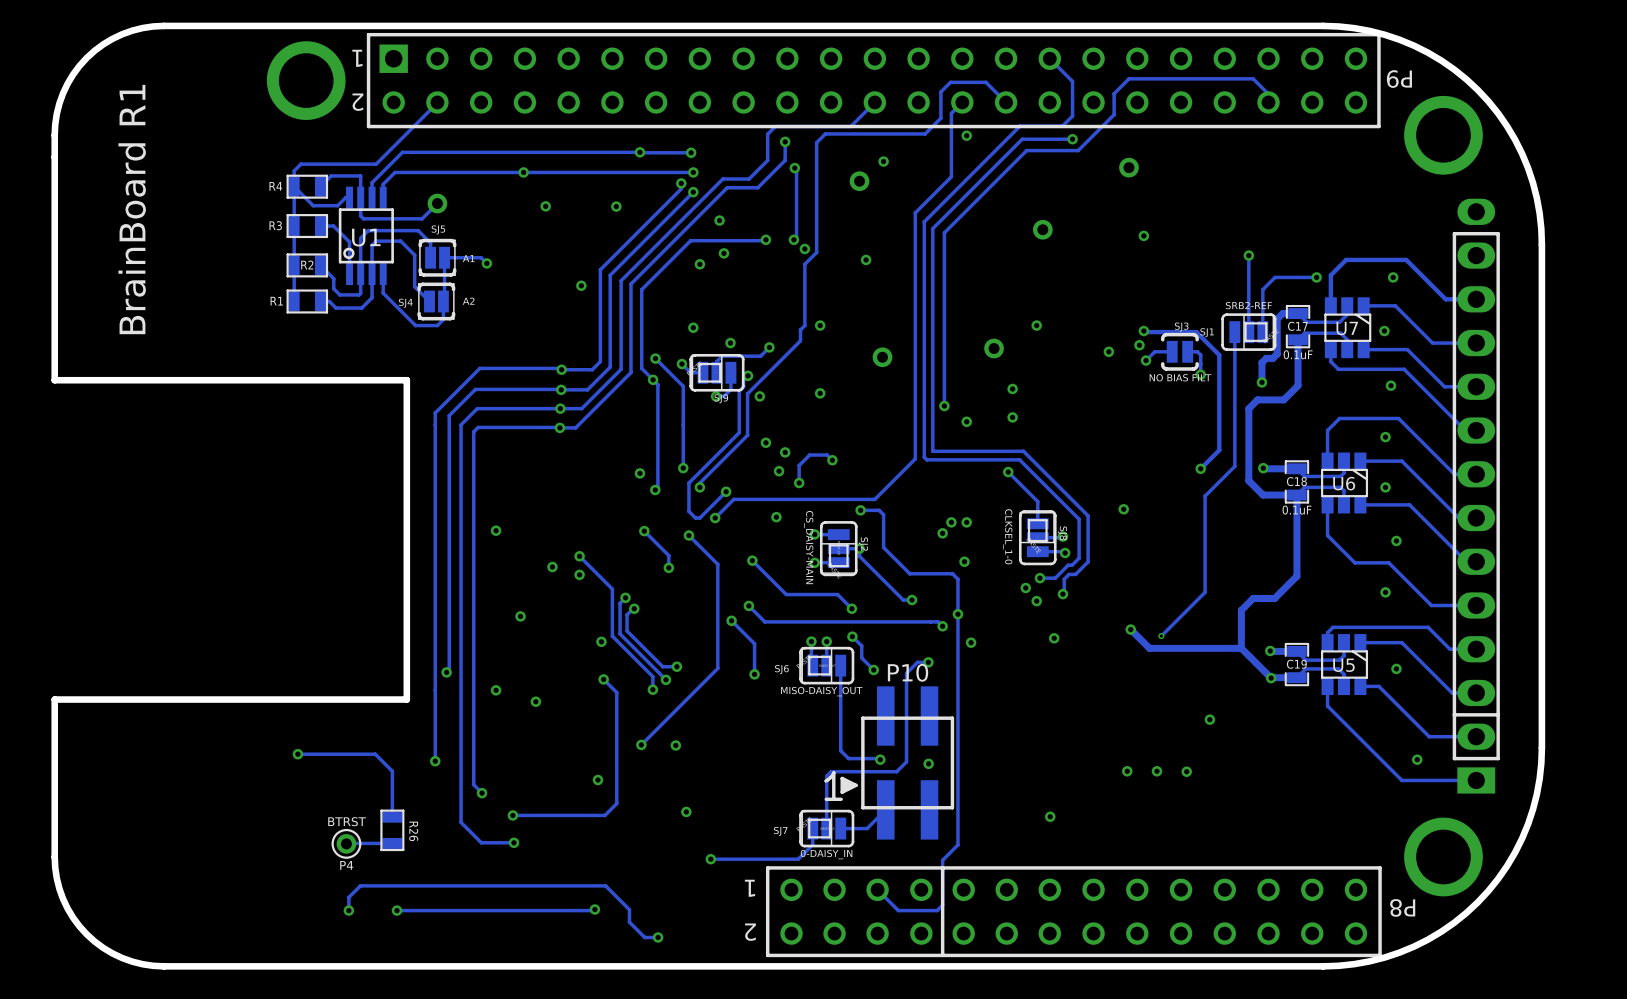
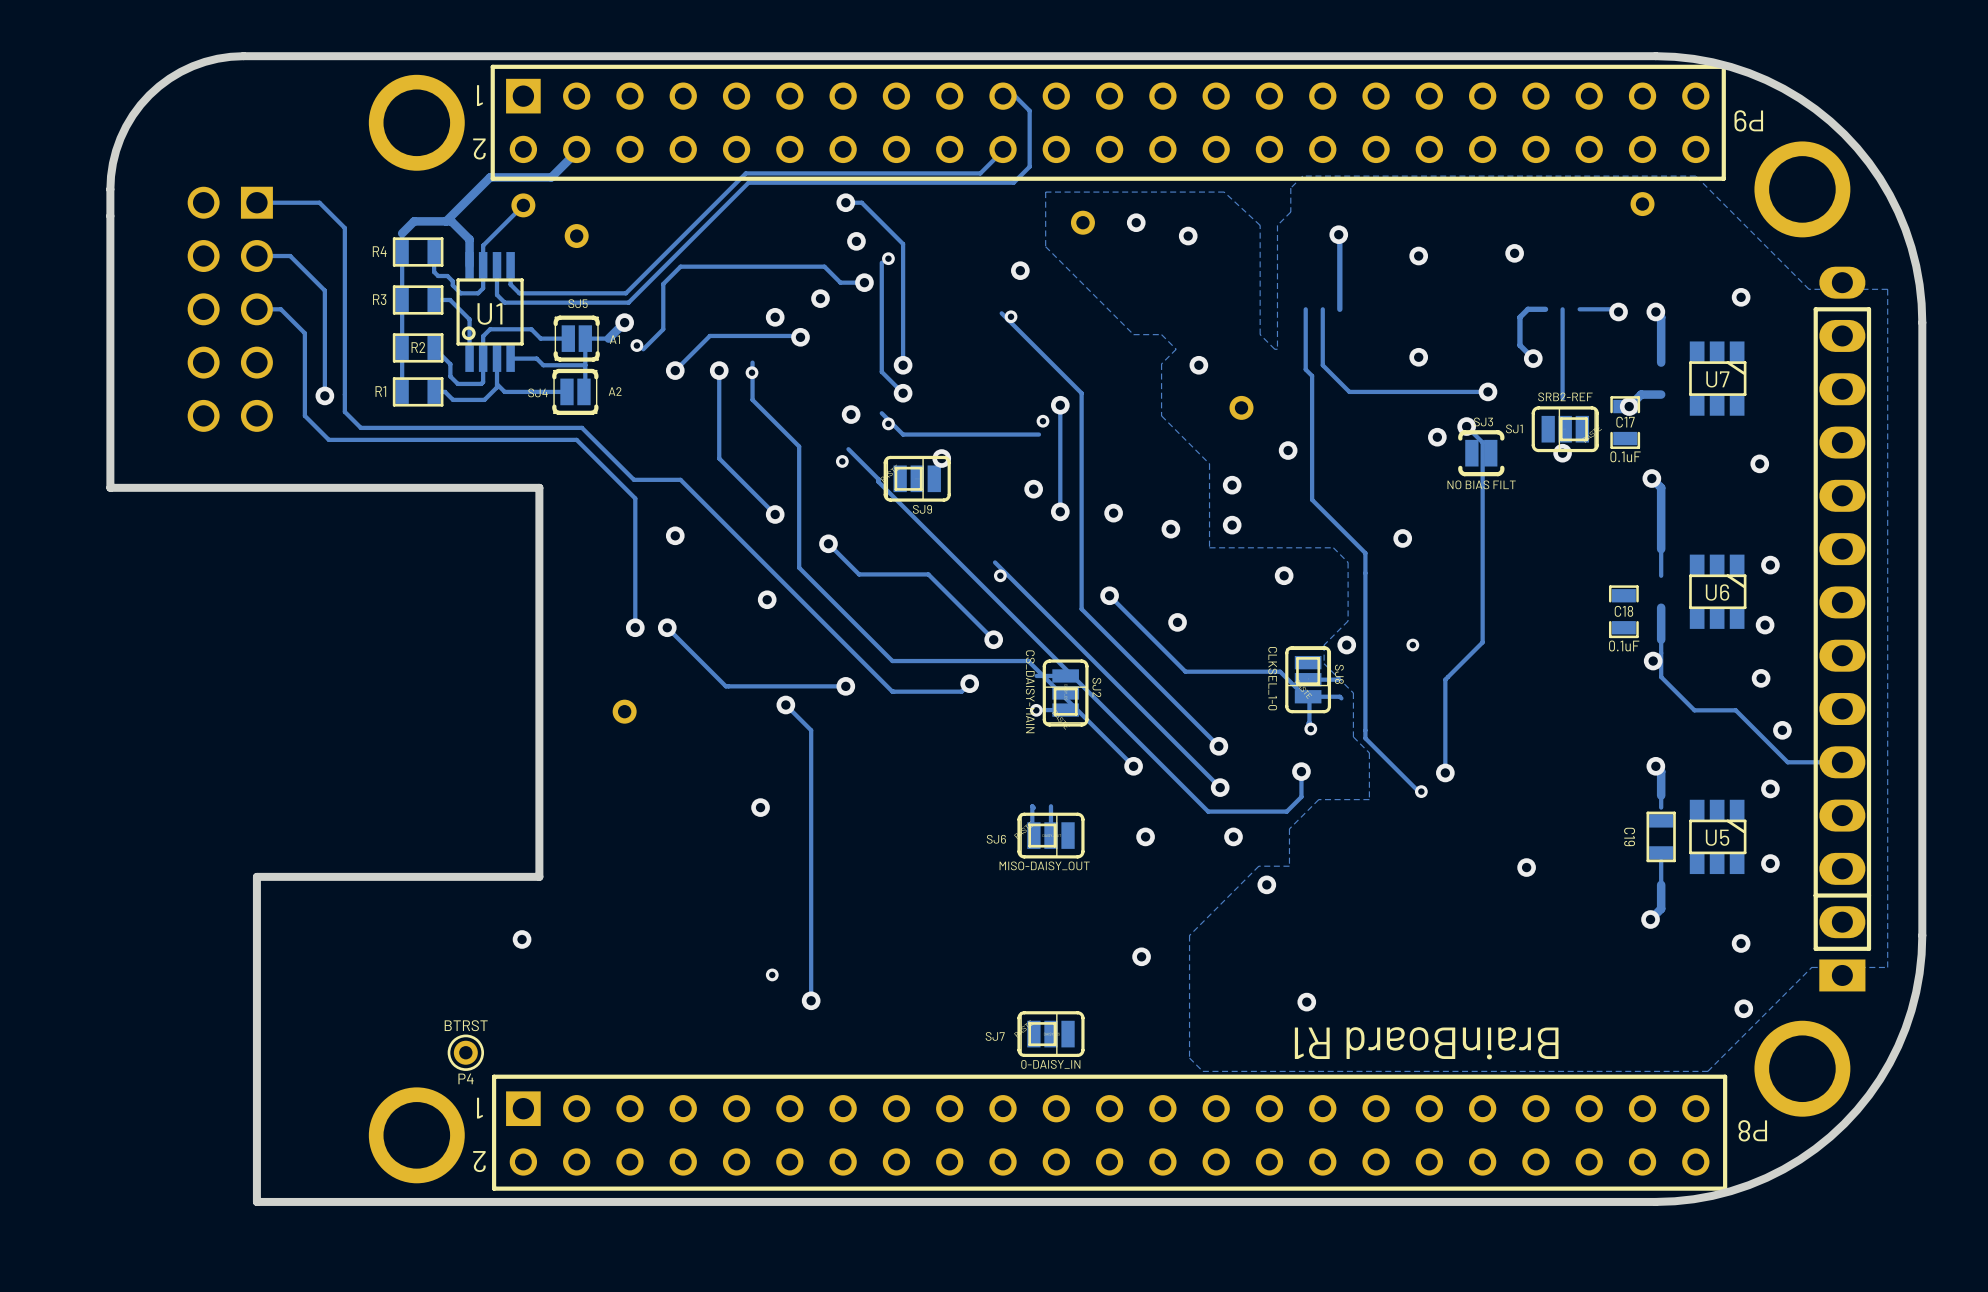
part footprint: [51, 22, 1546, 970] -> [106, 52, 1927, 1206]
track: (1049, 58) (1072, 81) (1072, 116) (1062, 126) (1020, 126) (924, 221) (924, 457) (926, 459) (1019, 459) (1079, 519) (1079, 558) (1072, 565) (1068, 565) (1055, 578) (1039, 578) -> none
track: (437, 102) (376, 164) (300, 164) (294, 171) -> (576, 149) (576, 152) (551, 177) (490, 177) (446, 221)
track: (874, 102) (850, 126) (775, 126) (767, 134) (767, 160) (749, 179) (722, 179) (621, 280) (621, 369) (581, 408) (477, 408) (461, 424) (461, 822) (481, 842) (513, 842) -> none
track: (962, 102) (951, 113) (951, 176) (915, 212) (915, 458) (874, 499) (733, 499) (715, 518) -> none
track: (1006, 102) (985, 82) (950, 82) (940, 91) (940, 118) (925, 133) (825, 133) (816, 142) (816, 252) (804, 264) (804, 325) (800, 329) (800, 340) (747, 393) (747, 435) (699, 483) (699, 487) -> none
track: (1268, 102) (1268, 94) (1253, 78) (1128, 78) (1114, 93) (1114, 114) (1078, 150) (1026, 150) (944, 232) (944, 406) -> none
zone outline: none -> (1695, 176) (1809, 289) (1887, 289) (1887, 967) (1811, 967) (1707, 1071) (1202, 1071) (1189, 1058) (1189, 935) (1258, 866) (1289, 866) (1289, 828) (1318, 799) (1369, 799) (1369, 752) (1353, 736) (1353, 693) (1324, 663) (1324, 645) (1348, 621) (1348, 562) (1333, 547) (1209, 547) (1209, 463) (1161, 415) (1161, 363) (1176, 349) (1161, 334) (1133, 334) (1045, 246) (1045, 192) (1224, 192) (1260, 225) (1260, 334) (1274, 349) (1277, 349) (1277, 225) (1290, 212) (1290, 188) (1302, 176) (1695, 176)
via: (966, 135) -> none
track: (1072, 139) (1022, 139) (932, 228) (932, 451) (1023, 451) (1088, 515) (1088, 561) (1075, 574) (1069, 574) (1064, 579) (1062, 594) -> none
via: (1072, 139) -> none
track: (785, 141) (785, 160) (757, 187) (727, 187) (630, 284) (630, 372) (575, 427) (478, 427) (473, 431) (473, 784) (482, 793) -> none
via: (785, 141) -> none
track: none -> (256, 202) (319, 202) (344, 228) (344, 411) (360, 427) (582, 427) (633, 479) (680, 479) (892, 691) (961, 691) (969, 683)
track: none -> (845, 202) (861, 202) (903, 244) (903, 365)
via: none -> (845, 202)
part: none -> (1642, 204)
part: none -> (523, 205)
via: (639, 152) -> none
track: (691, 152) (402, 152) (372, 182) (372, 197) -> (997, 96) (1015, 96) (1029, 110) (1029, 166) (1013, 182) (748, 182) (628, 302) (504, 302) (497, 294) (497, 265)
via: (691, 152) -> none
via: (883, 161) -> none
via: none -> (1136, 222)
part: (1128, 167) -> none
track: (794, 168) (796, 169) (796, 237) (793, 239) -> none
via: (794, 168) -> none
via: (523, 172) -> none
track: (693, 172) (395, 172) (383, 184) (383, 197) -> (1003, 149) (980, 173) (745, 173) (625, 293) (519, 293) (510, 284) (510, 265)
via: (693, 172) -> none
track: none -> (1338, 234) (1339, 309)
via: none -> (1338, 234)
via: none -> (1188, 236)
track: (360, 175) (331, 175) (320, 186) -> (483, 287) (478, 293) (460, 293) (447, 276) (438, 276) (434, 272) (434, 252)
track: (360, 176) (360, 181) -> (523, 205) (483, 245)
via: none -> (856, 241)
part position: (859, 181) -> (1082, 222)
track: (681, 183) (681, 188) (600, 269) (600, 361) (592, 369) (479, 368) (435, 413) (435, 761) -> none
via: (681, 183) -> none
track: (294, 186) (313, 205) (337, 205) (345, 197) (349, 197) -> (402, 233) (414, 221) (451, 221) (469, 239) (469, 265)
via: none -> (1514, 253)
track: none -> (256, 256) (290, 256) (324, 290) (324, 395)
via: none -> (1418, 256)
track: (693, 192) (610, 275) (610, 367) (587, 389) (475, 389) (449, 415) (449, 669) (446, 672) -> none
track: none -> (881, 262) (881, 371) (903, 393)
via: none -> (1020, 270)
track: (437, 203) (422, 218) (363, 218) (360, 215) -> none
part position: (437, 203) -> (576, 236)
via: (545, 206) -> none
via: (616, 206) -> none
text: BrainBoard R1 (132, 209) -> none
track: none -> (864, 282) (840, 282) (824, 266) (680, 266) (663, 283) (663, 329) (643, 349)
via: none -> (864, 282)
via: (719, 220) -> none
via: none -> (1741, 297)
via: none -> (820, 298)
part: (1042, 229) -> none
part: none -> (230, 309)
track: none -> (256, 309) (280, 309) (304, 333) (304, 415) (328, 439) (576, 439) (635, 498) (635, 627)
track: none -> (1305, 309) (1305, 369) (1312, 375) (1312, 499) (1365, 553) (1365, 738) (1417, 791)
track: none -> (1322, 309) (1322, 365) (1349, 391) (1487, 391)
track: none -> (1545, 309) (1527, 309) (1519, 317) (1519, 345) (1533, 358)
track: none -> (1562, 309) (1562, 398)
track: none -> (1579, 309) (1615, 309) (1618, 311)
via: (1143, 235) -> none
via: none -> (1618, 311)
track: none -> (1655, 311) (1661, 317) (1661, 362)
via: none -> (1655, 311)
track: none -> (1001, 313) (1081, 393) (1081, 609) (1218, 746)
track: (765, 239) (690, 240) (641, 289) (641, 368) (657, 384) (657, 487) (655, 490) -> none
via: (765, 239) -> none
via: none -> (775, 317)
via: none -> (624, 322)
via: (804, 249) -> none
via: (723, 253) -> none
track: (360, 255) (360, 238) (368, 230) (418, 230) (430, 243) (430, 257) -> (483, 336) (490, 329) (531, 329) (540, 338) (568, 338)
track: (1248, 255) (1248, 332) -> none
via: (1248, 255) -> none
track: none -> (800, 337) (709, 335) (675, 370)
via: none -> (800, 337)
track: (463, 257) (481, 257) (486, 263) -> (608, 338) (624, 322)
via: (866, 259) -> none
via: (699, 264) -> none
via: none -> (1418, 357)
track: (372, 274) (372, 245) (376, 241) (400, 241) (414, 255) (414, 286) (429, 301) -> (497, 384) (504, 391) (566, 391)
track: (383, 274) (383, 293) (415, 325) (437, 325) (443, 319) (443, 301) -> (510, 358) (536, 358) (543, 365) (585, 365)
via: none -> (1533, 358)
track: none -> (752, 362) (752, 399) (799, 446) (799, 567) (892, 661) (1028, 661) (1133, 766)
track: (1316, 277) (1275, 277) (1262, 289) (1262, 332) -> none
via: (1316, 277) -> none
via: (1393, 277) -> none
via: none -> (903, 365)
via: none -> (1198, 365)
via: none -> (675, 370)
track: none -> (719, 370) (719, 458) (775, 514)
via: none -> (719, 370)
track: (1476, 299) (1445, 299) (1406, 259) (1346, 259) (1330, 275) (1330, 305) -> none
via: none -> (1487, 391)
via: none -> (903, 393)
track: none -> (1661, 394) (1641, 394) (1629, 406)
via: none -> (324, 395)
track: (1347, 305) (1347, 314) (1339, 322) (1306, 322) (1298, 313) (1282, 313) (1277, 318) (1277, 353) (1272, 358) (1266, 358) (1261, 362) (1261, 382) -> none
track: (1363, 305) (1395, 305) (1432, 343) (1476, 343) -> none
track: none -> (1060, 405) (1060, 511)
via: none -> (1060, 405)
via: none -> (1629, 406)
track: none -> (881, 413) (903, 434) (1038, 434)
via: none -> (851, 414)
via: (1036, 325) -> none
U7 position: (1347, 327) -> (1717, 378)
track: none -> (1466, 426) (1482, 442) (1482, 642) (1445, 679) (1445, 772)
via: none -> (1466, 426)
track: (1143, 331) (1196, 332) (1219, 355) (1219, 450) (1200, 468) -> none
via: (1143, 331) -> none
via: (1384, 331) -> none
track: (1234, 332) (1234, 466) (1205, 496) (1205, 592) (1161, 636) -> none
via: none -> (1437, 437)
via: (730, 343) -> none
via: (1139, 345) -> none
track: (769, 347) (760, 356) (722, 356) (716, 361) (716, 372) -> none
via: (769, 347) -> none
track: none -> (848, 449) (878, 479) (878, 481) (1208, 811) (1286, 811) (1301, 796) (1301, 771)
part position: (994, 348) -> (1241, 407)
via: none -> (1288, 450)
track: (1330, 349) (1330, 361) (1338, 369) (1404, 369) (1465, 430) (1476, 430) -> none
track: (1347, 349) (1347, 339) (1340, 333) (1304, 333) (1298, 339) (1298, 385) (1283, 399) (1257, 399) (1248, 408) (1248, 480) (1263, 495) (1296, 495) -> none
track: (1363, 349) (1407, 349) (1444, 386) (1476, 386) -> none
via: (1108, 351) -> none
track: (1172, 351) (1154, 351) (1146, 360) -> none
track: (1187, 351) (1197, 351) (1200, 355) (1200, 374) -> none
via: none -> (1562, 453)
via: none -> (941, 458)
part: (882, 357) -> none
track: (655, 358) (683, 386) (683, 467) -> none
via: (1146, 360) -> none
via: none -> (1759, 463)
track: (681, 364) (690, 372) (702, 372) -> none
via: (681, 364) -> none
via: (561, 369) -> none
track: (730, 372) (730, 389) (723, 396) (716, 396) -> none
via: none -> (1651, 478)
via: (1200, 374) -> none
track: (748, 375) (743, 380) (743, 386) (739, 391) (739, 432) (688, 483) (688, 511) (695, 518) (699, 518) (726, 491) -> none
via: (748, 375) -> none
via: none -> (1232, 485)
via: (653, 379) -> none
via: (1261, 382) -> none
via: (1390, 385) -> none
via: (1012, 388) -> none
via: (561, 389) -> none
via position: (820, 393) -> (1033, 489)
via: (716, 396) -> none
via: (759, 396) -> none
via: none -> (1060, 511)
via: none -> (1113, 513)
via: none -> (775, 514)
via: (944, 406) -> none
via: (560, 408) -> none
via: none -> (1170, 529)
via: (1012, 417) -> none
via: none -> (675, 535)
via position: (966, 421) -> (1232, 525)
via: none -> (1402, 538)
track: none -> (828, 543) (859, 574) (928, 574) (993, 639)
via: none -> (828, 543)
via: (559, 427) -> none
track: (1327, 430) (1339, 418) (1398, 418) (1454, 474) (1476, 474) -> (1661, 549) (1661, 487) (1651, 478)
via: (1385, 437) -> none
track: none -> (995, 562) (1220, 787)
via: (765, 442) -> none
via: none -> (1770, 565)
via: none -> (1284, 575)
track: (832, 460) (827, 455) (809, 455) (799, 465) (799, 483) -> none
via: (832, 460) -> none
track: (1343, 461) (1343, 473) (1340, 476) (1304, 476) (1296, 468) (1263, 468) -> none
track: (1360, 461) (1401, 461) (1458, 518) (1476, 518) -> none
via: (683, 468) -> none
track: none -> (1109, 595) (1185, 671) (1280, 671) (1309, 701) (1308, 723)
via: none -> (1109, 595)
via: (1200, 468) -> none
via: (1263, 468) -> none
via: (779, 471) -> none
via: none -> (767, 599)
track: (1008, 472) (1037, 501) (1037, 523) -> none
via: (1008, 472) -> none
via: (639, 473) -> none
track: none -> (1661, 607) (1661, 639)
via: (799, 483) -> none
U6 position: (1344, 483) -> (1717, 591)
via: (699, 487) -> none
via: (1385, 487) -> none
via: (655, 490) -> none
via: none -> (1177, 622)
via: (726, 491) -> none
via: none -> (1765, 625)
via: none -> (635, 627)
track: none -> (667, 627) (725, 686) (845, 686)
via: none -> (667, 627)
track: (1296, 495) (1296, 576) (1274, 598) (1253, 598) (1241, 610) (1241, 648) -> none
track: (1296, 495) (1304, 487) (1340, 487) (1343, 490) (1343, 504) -> none
track: (1360, 504) (1409, 504) (1466, 561) (1476, 561) -> none
via: none -> (1346, 645)
track: (860, 510) (879, 510) (883, 514) (883, 547) (909, 573) (952, 573) (957, 579) (957, 844) (942, 860) (942, 905) (937, 910) (898, 910) (877, 889) -> none
via: (860, 510) -> none
via position: (776, 517) -> (993, 639)
via: (715, 518) -> none
via: (951, 522) -> none
via: (966, 522) -> none
via: none -> (1653, 661)
via: (496, 530) -> none
track: (644, 531) (668, 555) (668, 567) -> none
via: (644, 531) -> none
via: (942, 533) -> none
via: (814, 534) -> none
track: (688, 535) (717, 564) (717, 668) (641, 744) -> none
via: (688, 535) -> none
via: (1062, 536) -> none
via: none -> (1761, 678)
via: none -> (969, 683)
via: (1396, 540) -> none
via: none -> (845, 686)
track: (838, 548) (859, 548) (859, 556) (903, 600) (912, 600) -> none
via: (859, 548) -> none
via: (1065, 553) -> none
track: (579, 556) (612, 589) (612, 636) (652, 676) (652, 689) -> none
via: (579, 556) -> none
track: none -> (785, 705) (811, 730) (811, 1000)
via: none -> (785, 705)
track: (752, 560) (786, 594) (837, 594) (851, 608) -> none
via: (752, 560) -> none
via: (964, 561) -> none
part: none -> (624, 711)
via: (552, 567) -> none
via: (668, 567) -> none
via: (579, 574) -> none
via: none -> (1782, 730)
via: (1025, 588) -> none
via: none -> (1218, 746)
via: (1385, 592) -> none
via: (1062, 594) -> none
track: (625, 597) (620, 603) (620, 633) (665, 679) -> none
via: (625, 597) -> none
via: (912, 600) -> none
via position: (1036, 601) -> (1301, 771)
track: (748, 605) (764, 621) (938, 621) (942, 626) -> none
via: (748, 605) -> none
track: (634, 608) (627, 614) (627, 631) (662, 666) (676, 666) -> none
via: (634, 608) -> none
via: (851, 608) -> none
via: none -> (1133, 766)
via: none -> (1655, 766)
via position: (957, 614) -> (1220, 787)
via: none -> (1445, 772)
via: (520, 616) -> none
track: (731, 620) (754, 643) (754, 674) -> none
via: (731, 620) -> none
via: (942, 626) -> none
via: none -> (1770, 788)
track: (1130, 629) (1149, 648) (1241, 648) -> none
track: (1327, 632) (1333, 627) (1428, 627) (1450, 649) (1476, 649) -> (1661, 795) (1661, 771) (1655, 766)
track: (852, 636) (861, 645) (861, 657) (873, 670) -> none
via: (852, 636) -> none
via: (1161, 636) -> none
via: (1054, 638) -> none
via: (601, 641) -> none
via: (811, 641) -> none
via: (826, 641) -> none
via: none -> (760, 807)
via: (971, 642) -> none
C19 footprint: [1284, 642, 1310, 687] -> [1646, 811, 1676, 863]
track: (1343, 642) (1343, 655) (1339, 660) (1305, 660) (1296, 651) (1270, 650) -> none
track: (1360, 642) (1401, 642) (1452, 692) (1476, 692) -> none
track: (1241, 648) (1271, 678) (1296, 677) (1305, 668) (1338, 668) (1343, 674) (1343, 686) -> none
via: (1270, 650) -> none
track: (928, 662) (917, 662) (906, 673) (906, 761) (896, 771) (831, 771) (826, 776) (826, 828) -> none
via: (928, 662) -> none
U5 position: (1344, 664) -> (1717, 836)
track: (840, 665) (840, 750) (848, 758) (880, 759) -> none
via: (676, 666) -> none
via: none -> (1145, 836)
via: none -> (1233, 836)
via: (1396, 668) -> none
via: (873, 670) -> none
via: (446, 672) -> none
via: (754, 674) -> none
via: (1271, 678) -> none
track: (603, 679) (616, 692) (616, 803) (604, 815) (512, 815) -> none
via: (603, 679) -> none
via: (665, 679) -> none
track: (1360, 686) (1378, 686) (1429, 736) (1476, 736) -> none
via: none -> (1770, 863)
via: (652, 689) -> none
via: (496, 690) -> none
via: none -> (1526, 867)
via: (535, 701) -> none
via: none -> (1266, 884)
track: (1327, 706) (1401, 780) (1476, 780) -> (1661, 884) (1661, 908) (1650, 919)
via: (1209, 719) -> none
via: none -> (1650, 919)
via: (641, 744) -> none
via: (675, 745) -> none
via: none -> (522, 939)
track: (297, 754) (375, 754) (392, 771) (392, 817) -> none
via: (297, 754) -> none
via: none -> (1741, 943)
via: (880, 759) -> none
via: (1417, 759) -> none
via: (435, 761) -> none
P10: (889, 762) -> none
via: (928, 763) -> none
via: none -> (1141, 956)
via: (1127, 771) -> none
via: (1156, 771) -> none
via: (1186, 771) -> none
via: (482, 793) -> none
via: none -> (811, 1000)
via: none -> (1306, 1002)
via: none -> (1743, 1008)
track: (885, 809) (867, 828) (840, 828) -> none
via: (686, 811) -> none
via: (512, 815) -> none
via: (1050, 816) -> none
track: (812, 828) (812, 844) (798, 859) (710, 859) -> none
R26: (392, 830) -> none
text: none -> BrainBoard R1 (1426, 1043)
via: (513, 842) -> none
track: (392, 843) (346, 843) -> none
via: (710, 859) -> none
line: (942, 867) (942, 955) -> none
line: (1380, 867) (767, 867) (767, 955) -> (1725, 1082) (1725, 1076) (494, 1076) (494, 1188) (979, 1188)
text position: 1 (749, 888) -> 1 (479, 1108)
track: (594, 909) (396, 910) -> none
via: (594, 909) -> none
track: (348, 910) (348, 897) (360, 885) (605, 885) (629, 909) (629, 922) (644, 937) (658, 937) -> none
via: (348, 910) -> none
via: (396, 910) -> none
text position: 2 (750, 932) -> 2 (479, 1161)
via: (658, 937) -> none

